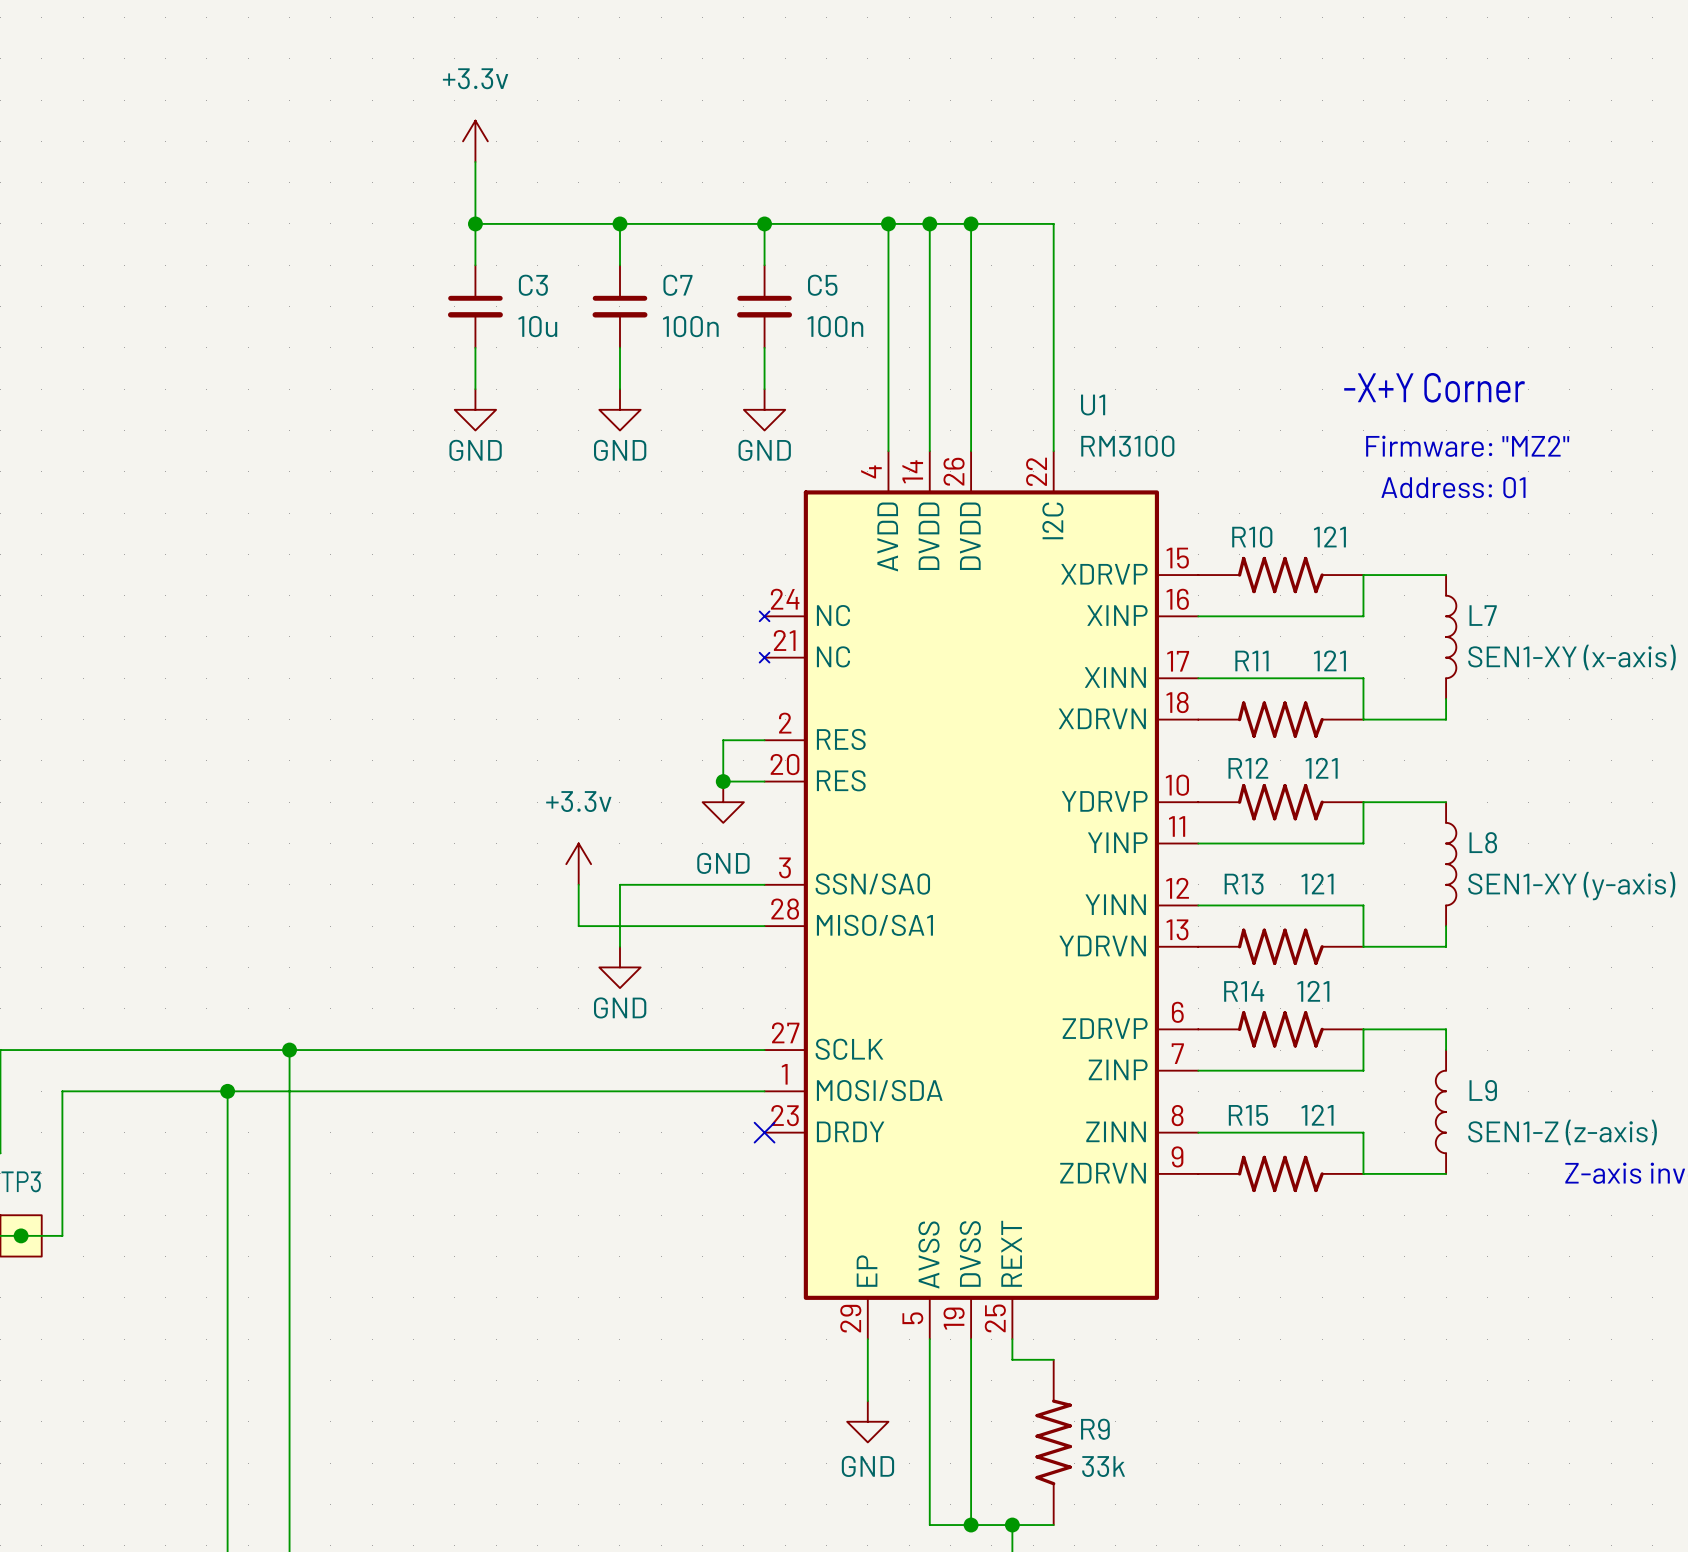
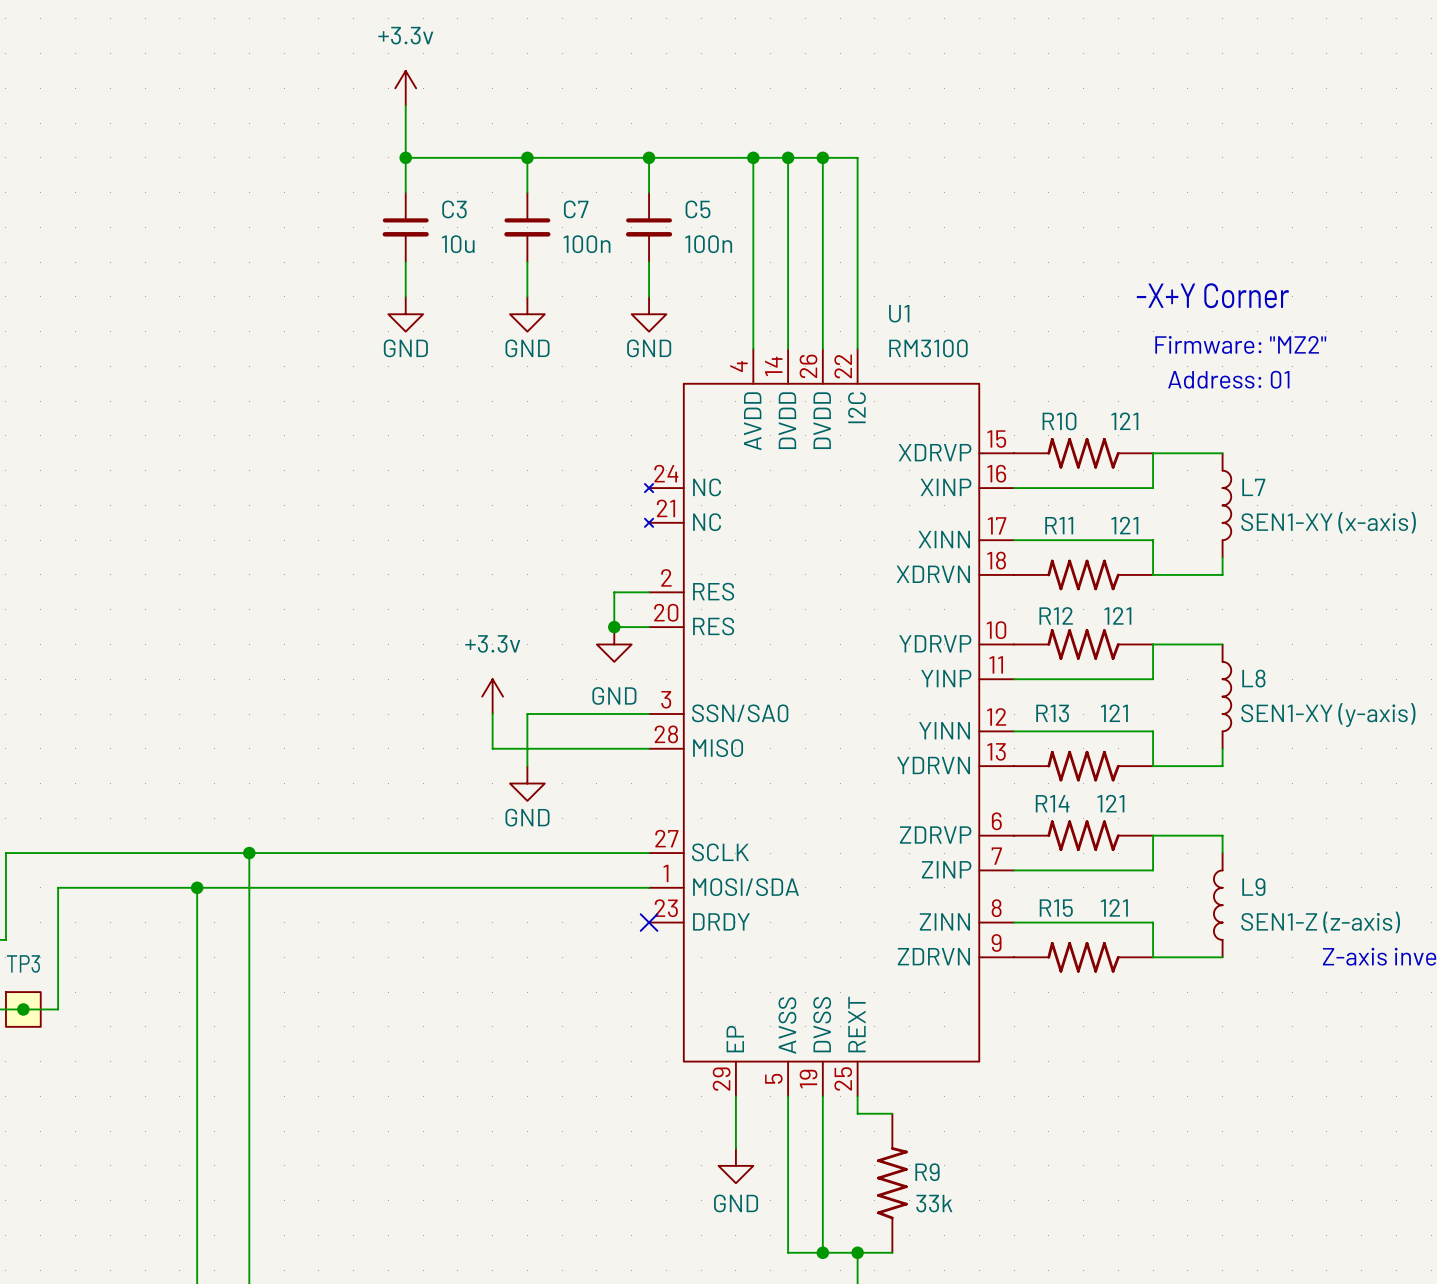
wire: (1012, 223) (1053, 223) (1053, 451) -> (857, 157) (857, 349)
U1 symbol: [759, 451, 1199, 1340] -> [644, 349, 1015, 1097]

